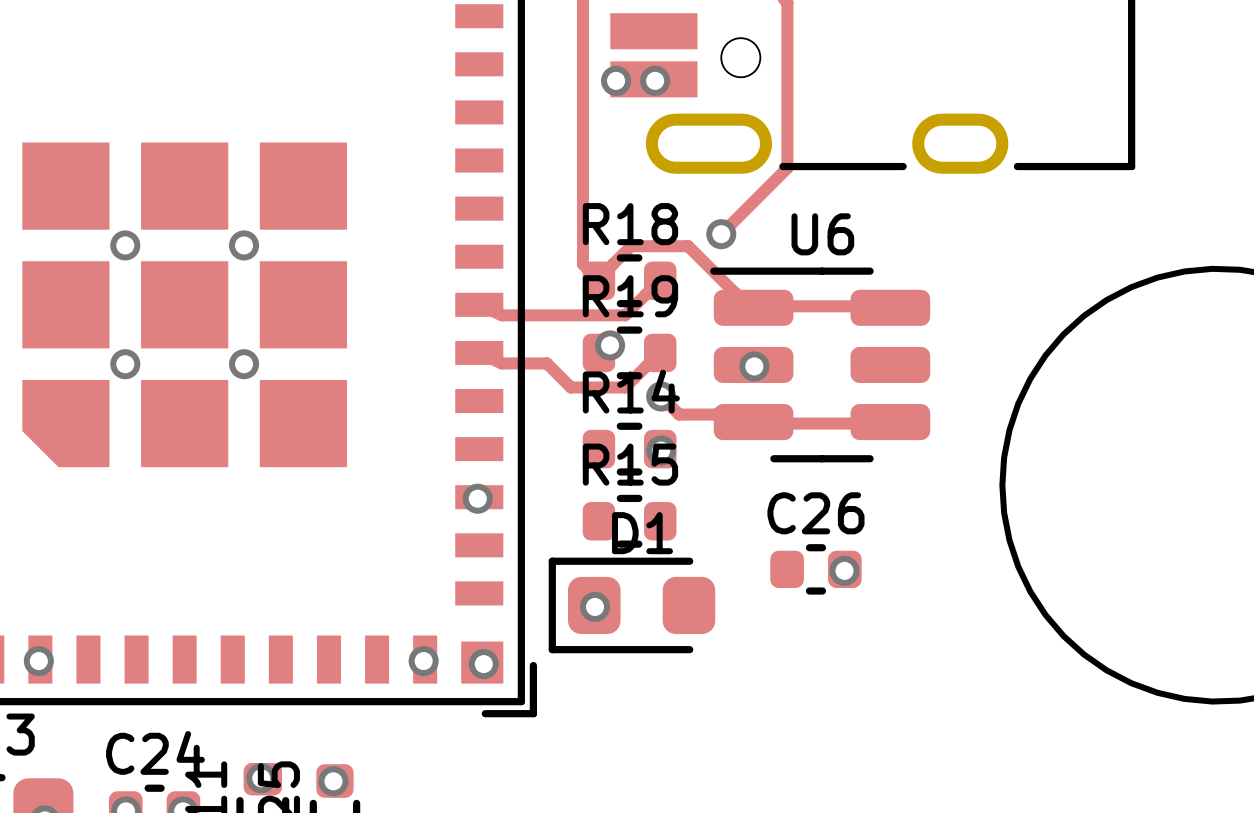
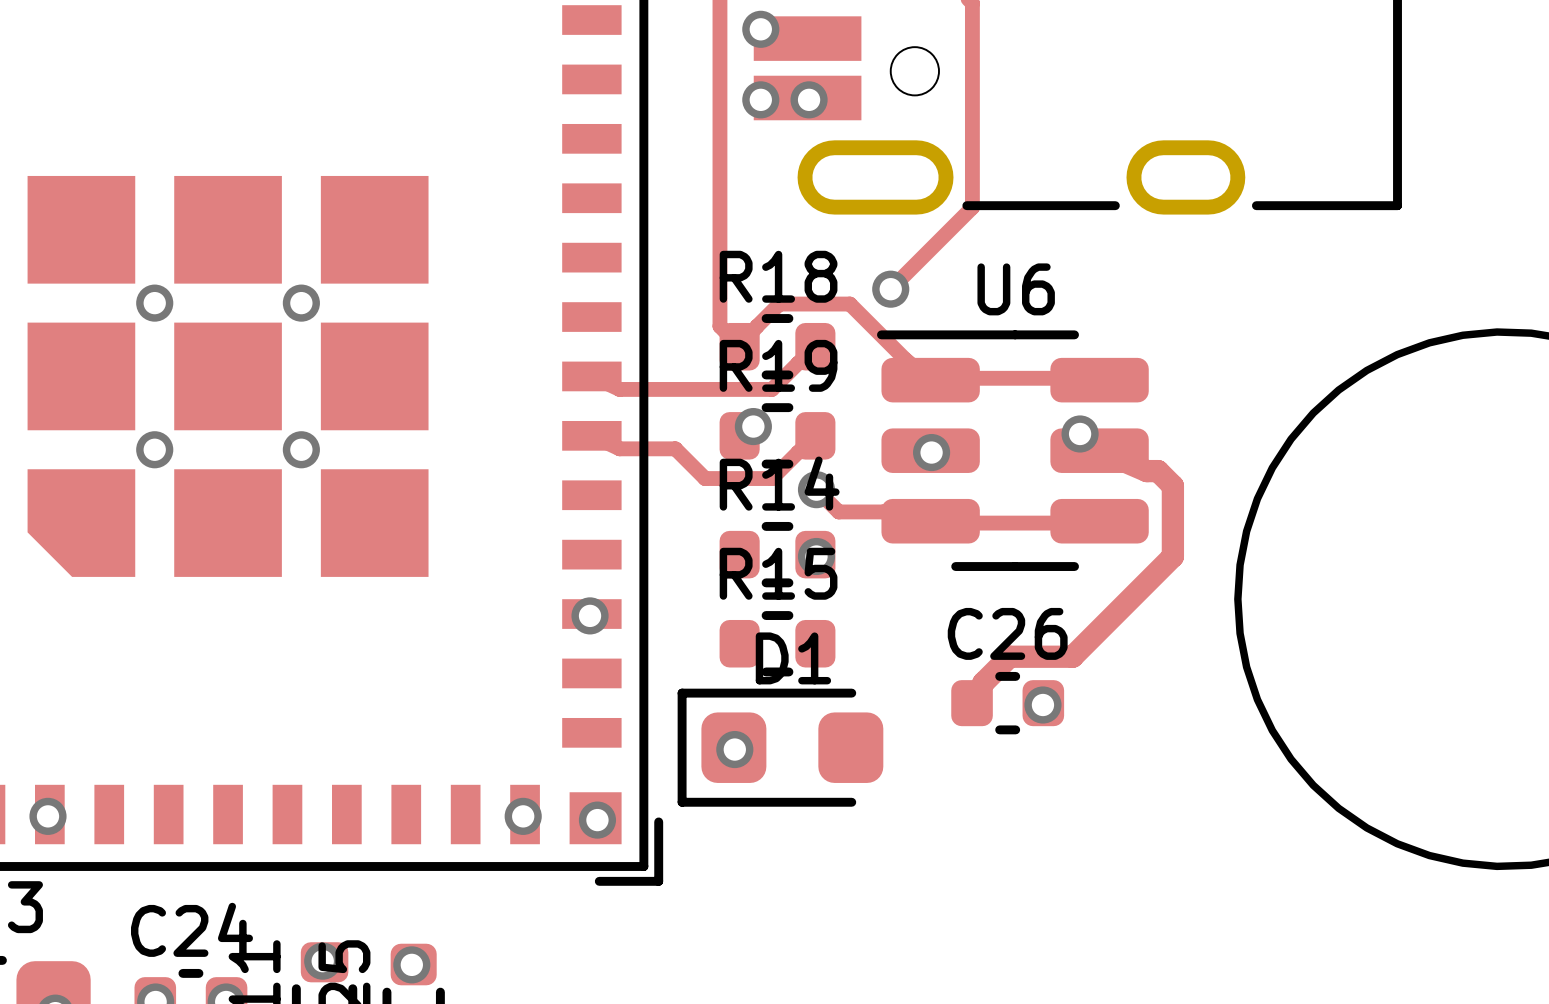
via: none -> (760, 29)
track: none -> (1080, 433) (1099, 450) (1146, 471) (1158, 471) (1172, 485) (1172, 556) (1072, 656) (1009, 656) (983, 682) (972, 703)
via: none -> (1080, 433)

